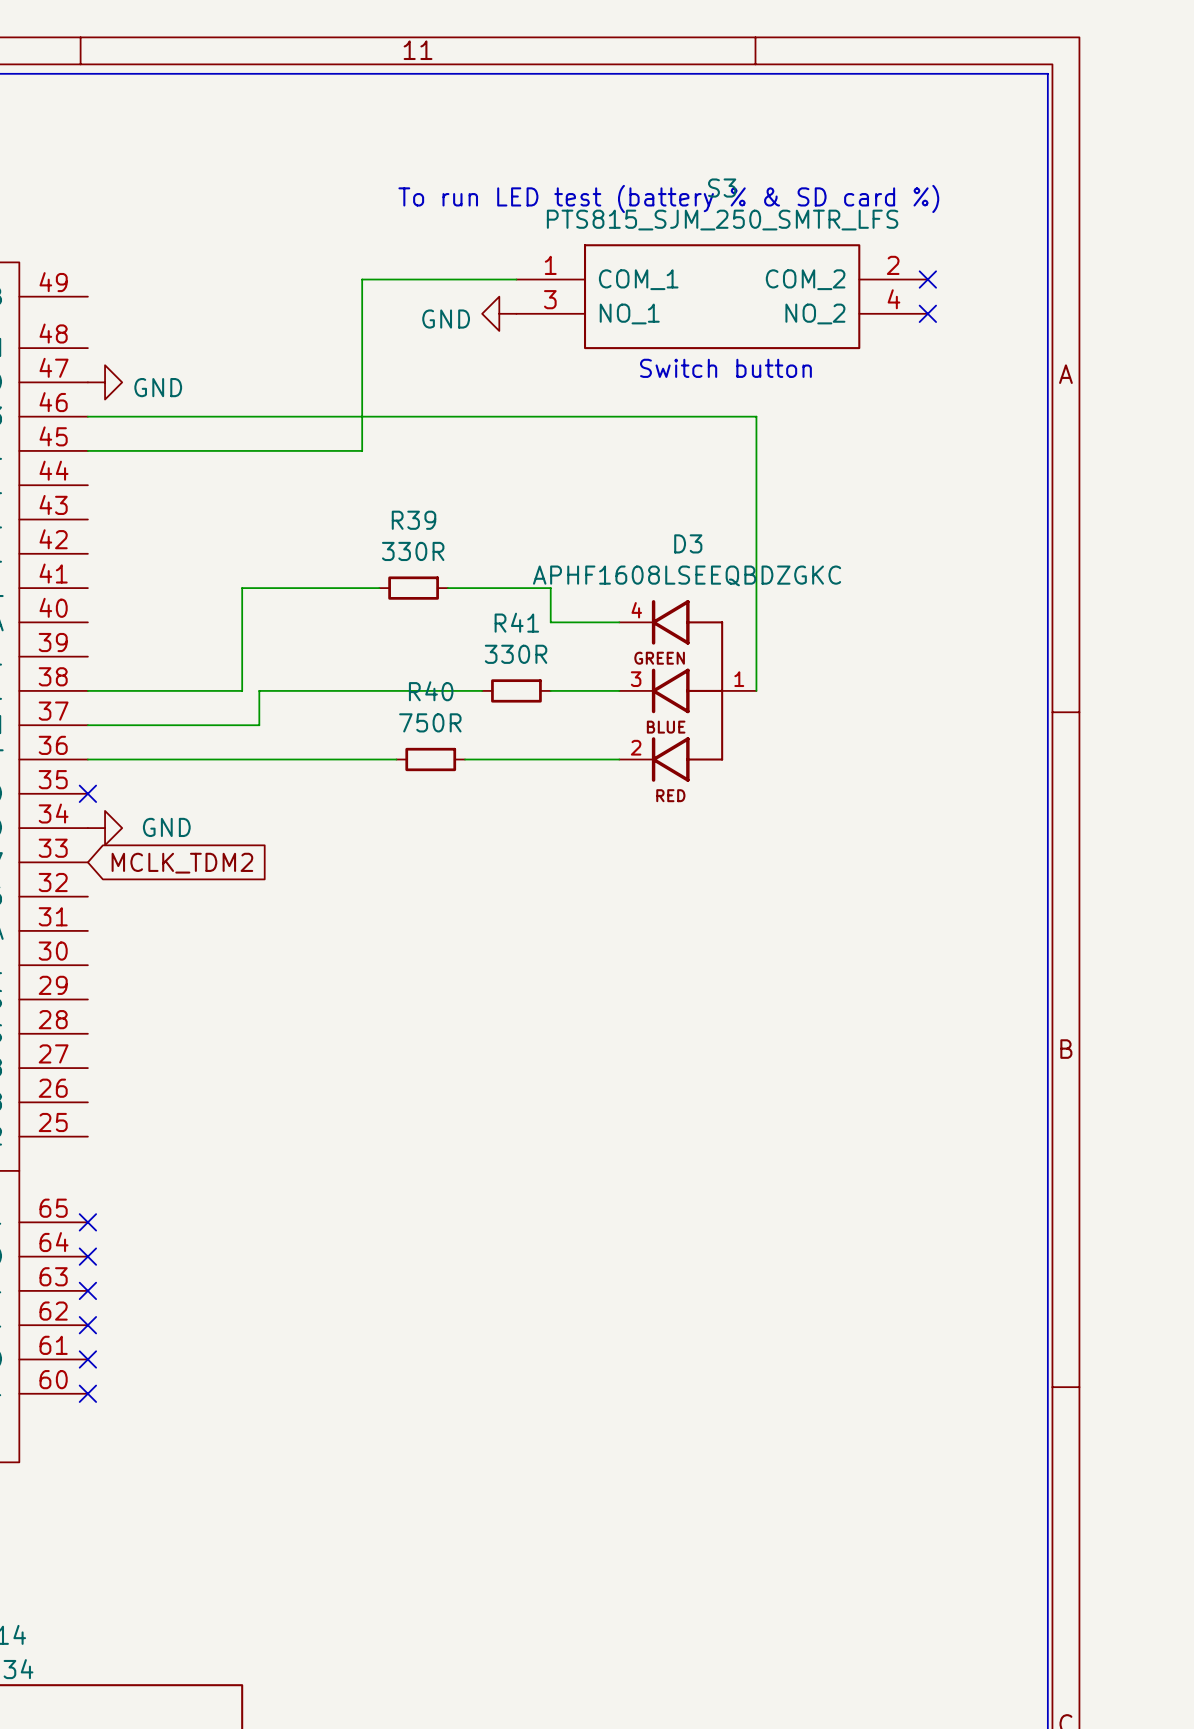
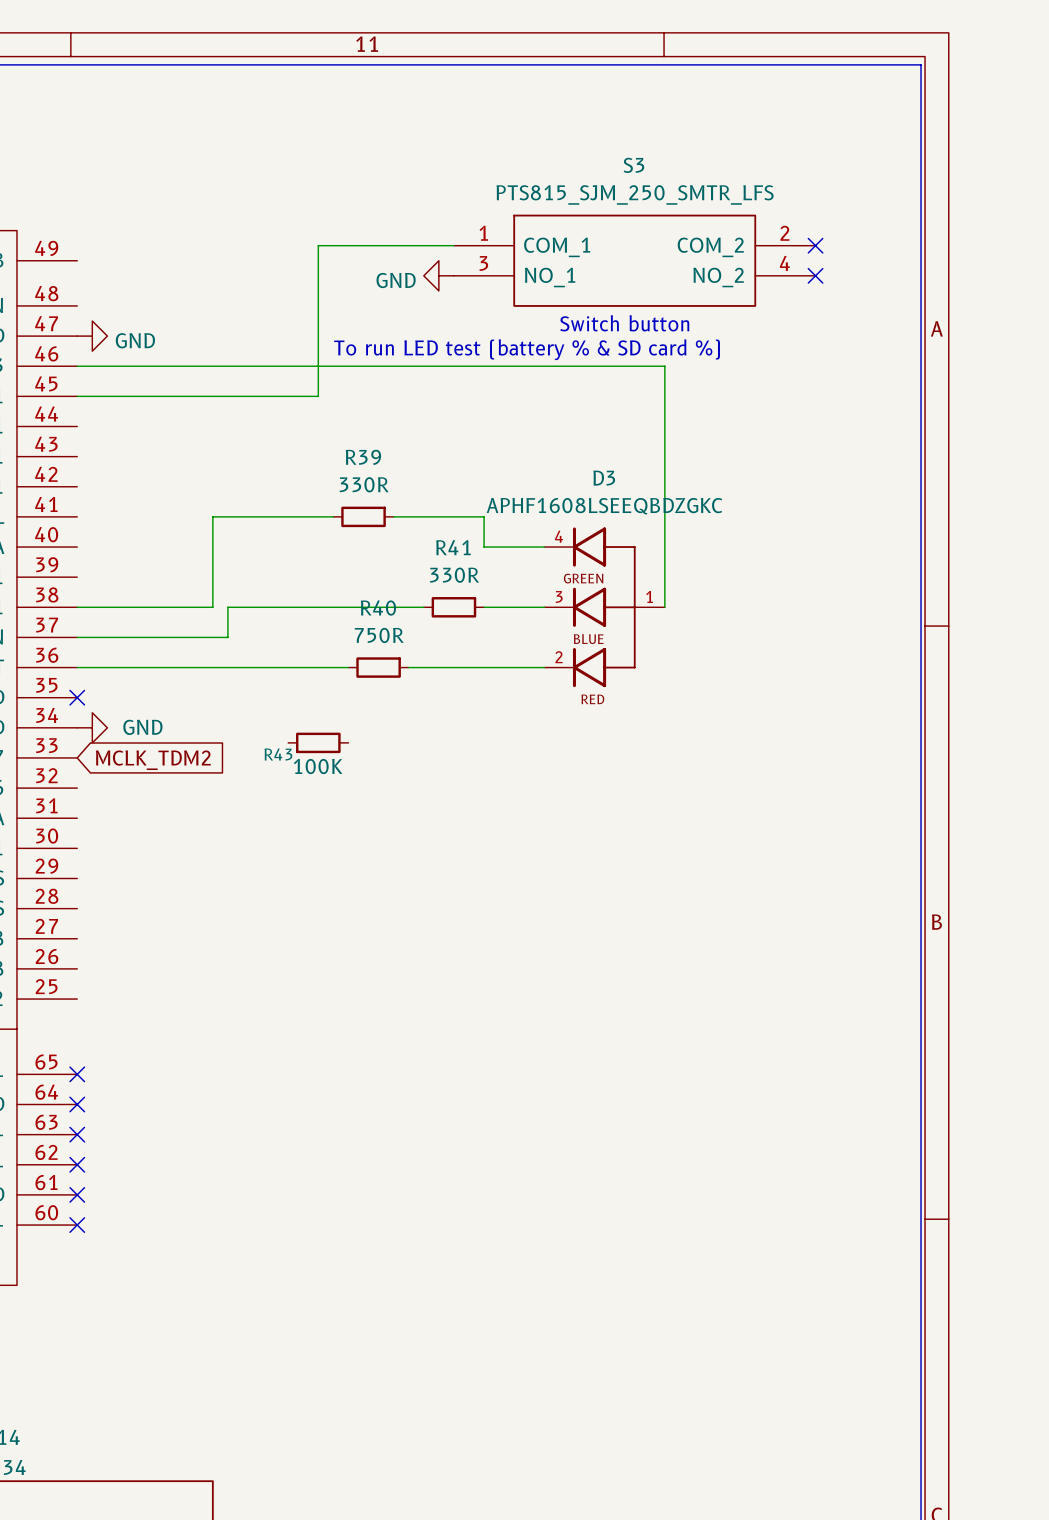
text position: To run LED test (battery % & SD card %) (668, 198) -> To run LED test (battery % & SD card %) (527, 349)
R43: none -> 100K (318, 742)

